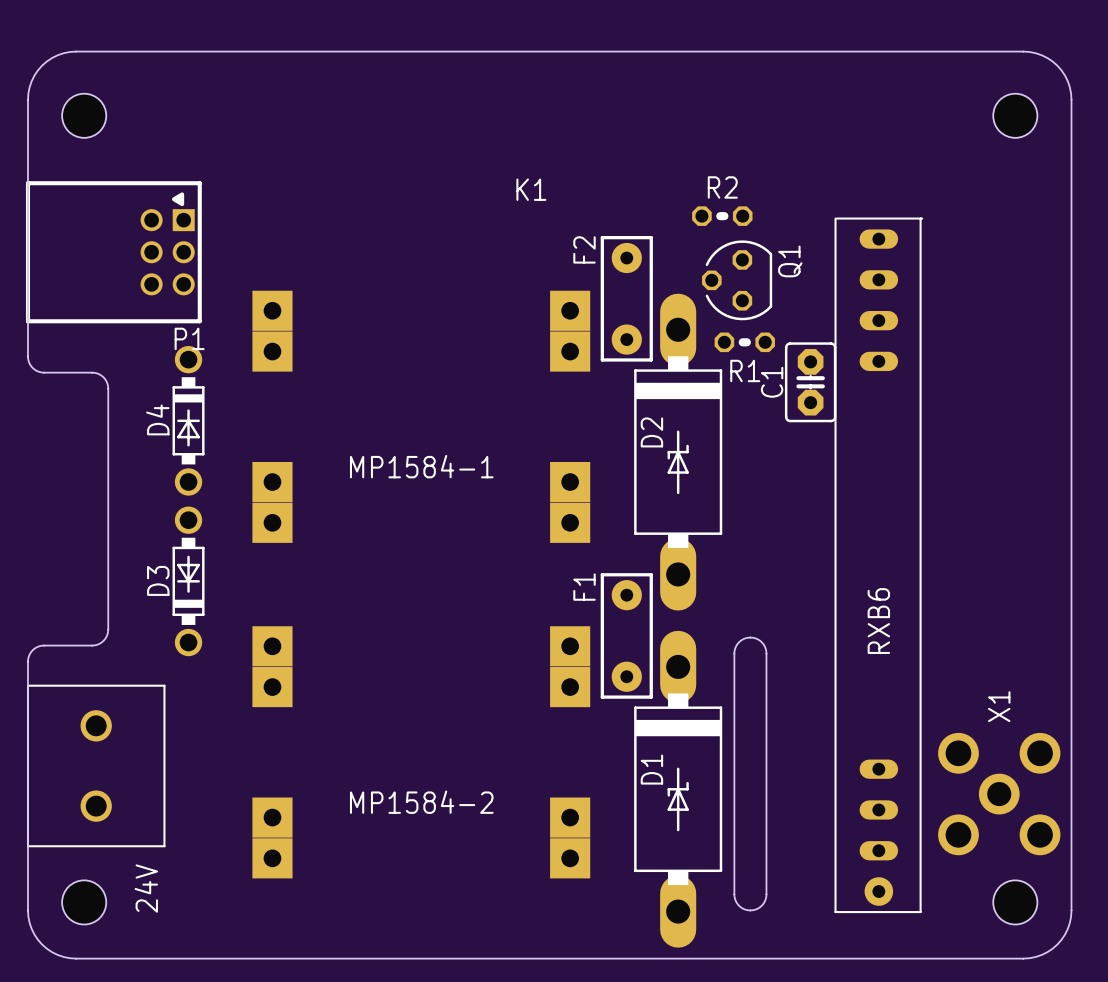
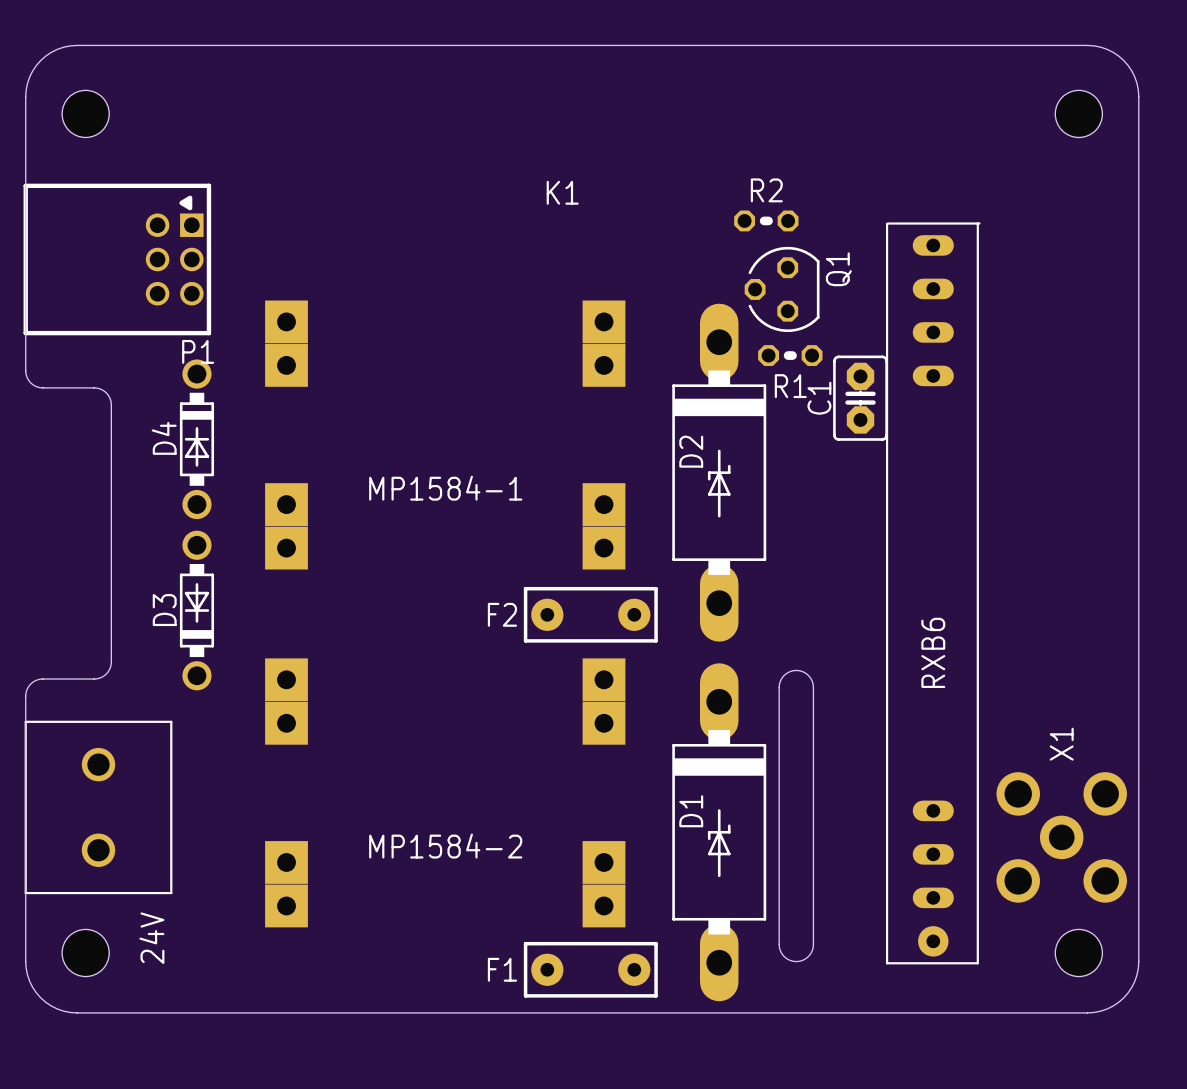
F2 name position: F2 (584, 249) -> F2 (502, 614)
F2 rotation: 0° (626, 298) -> 90° clockwise (590, 614)
F2 position: (626, 298) -> (590, 614)
F1 name position: F1 (584, 587) -> F1 (502, 969)
F1 rotation: 0° (626, 635) -> 90° clockwise (590, 969)
F1 position: (626, 635) -> (590, 969)

